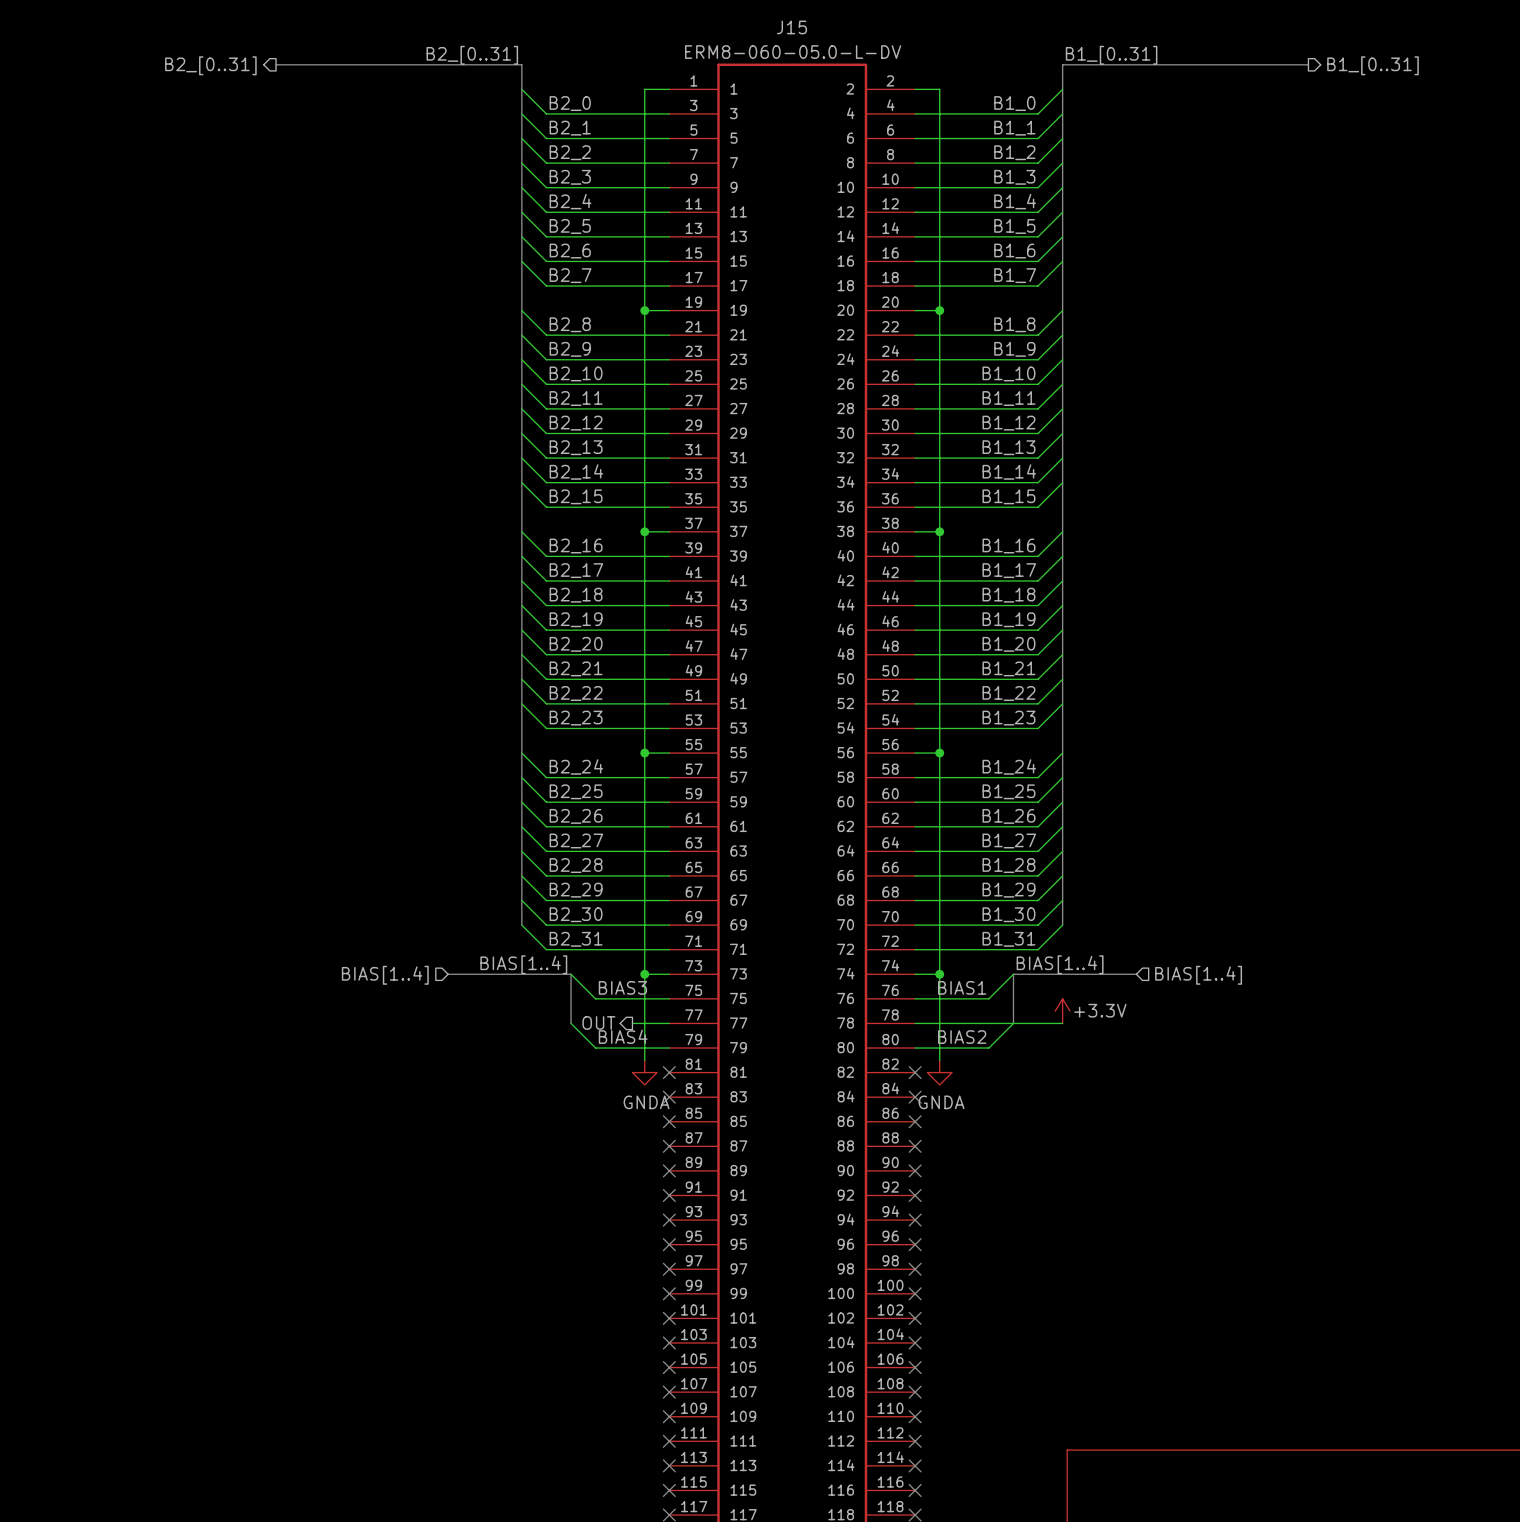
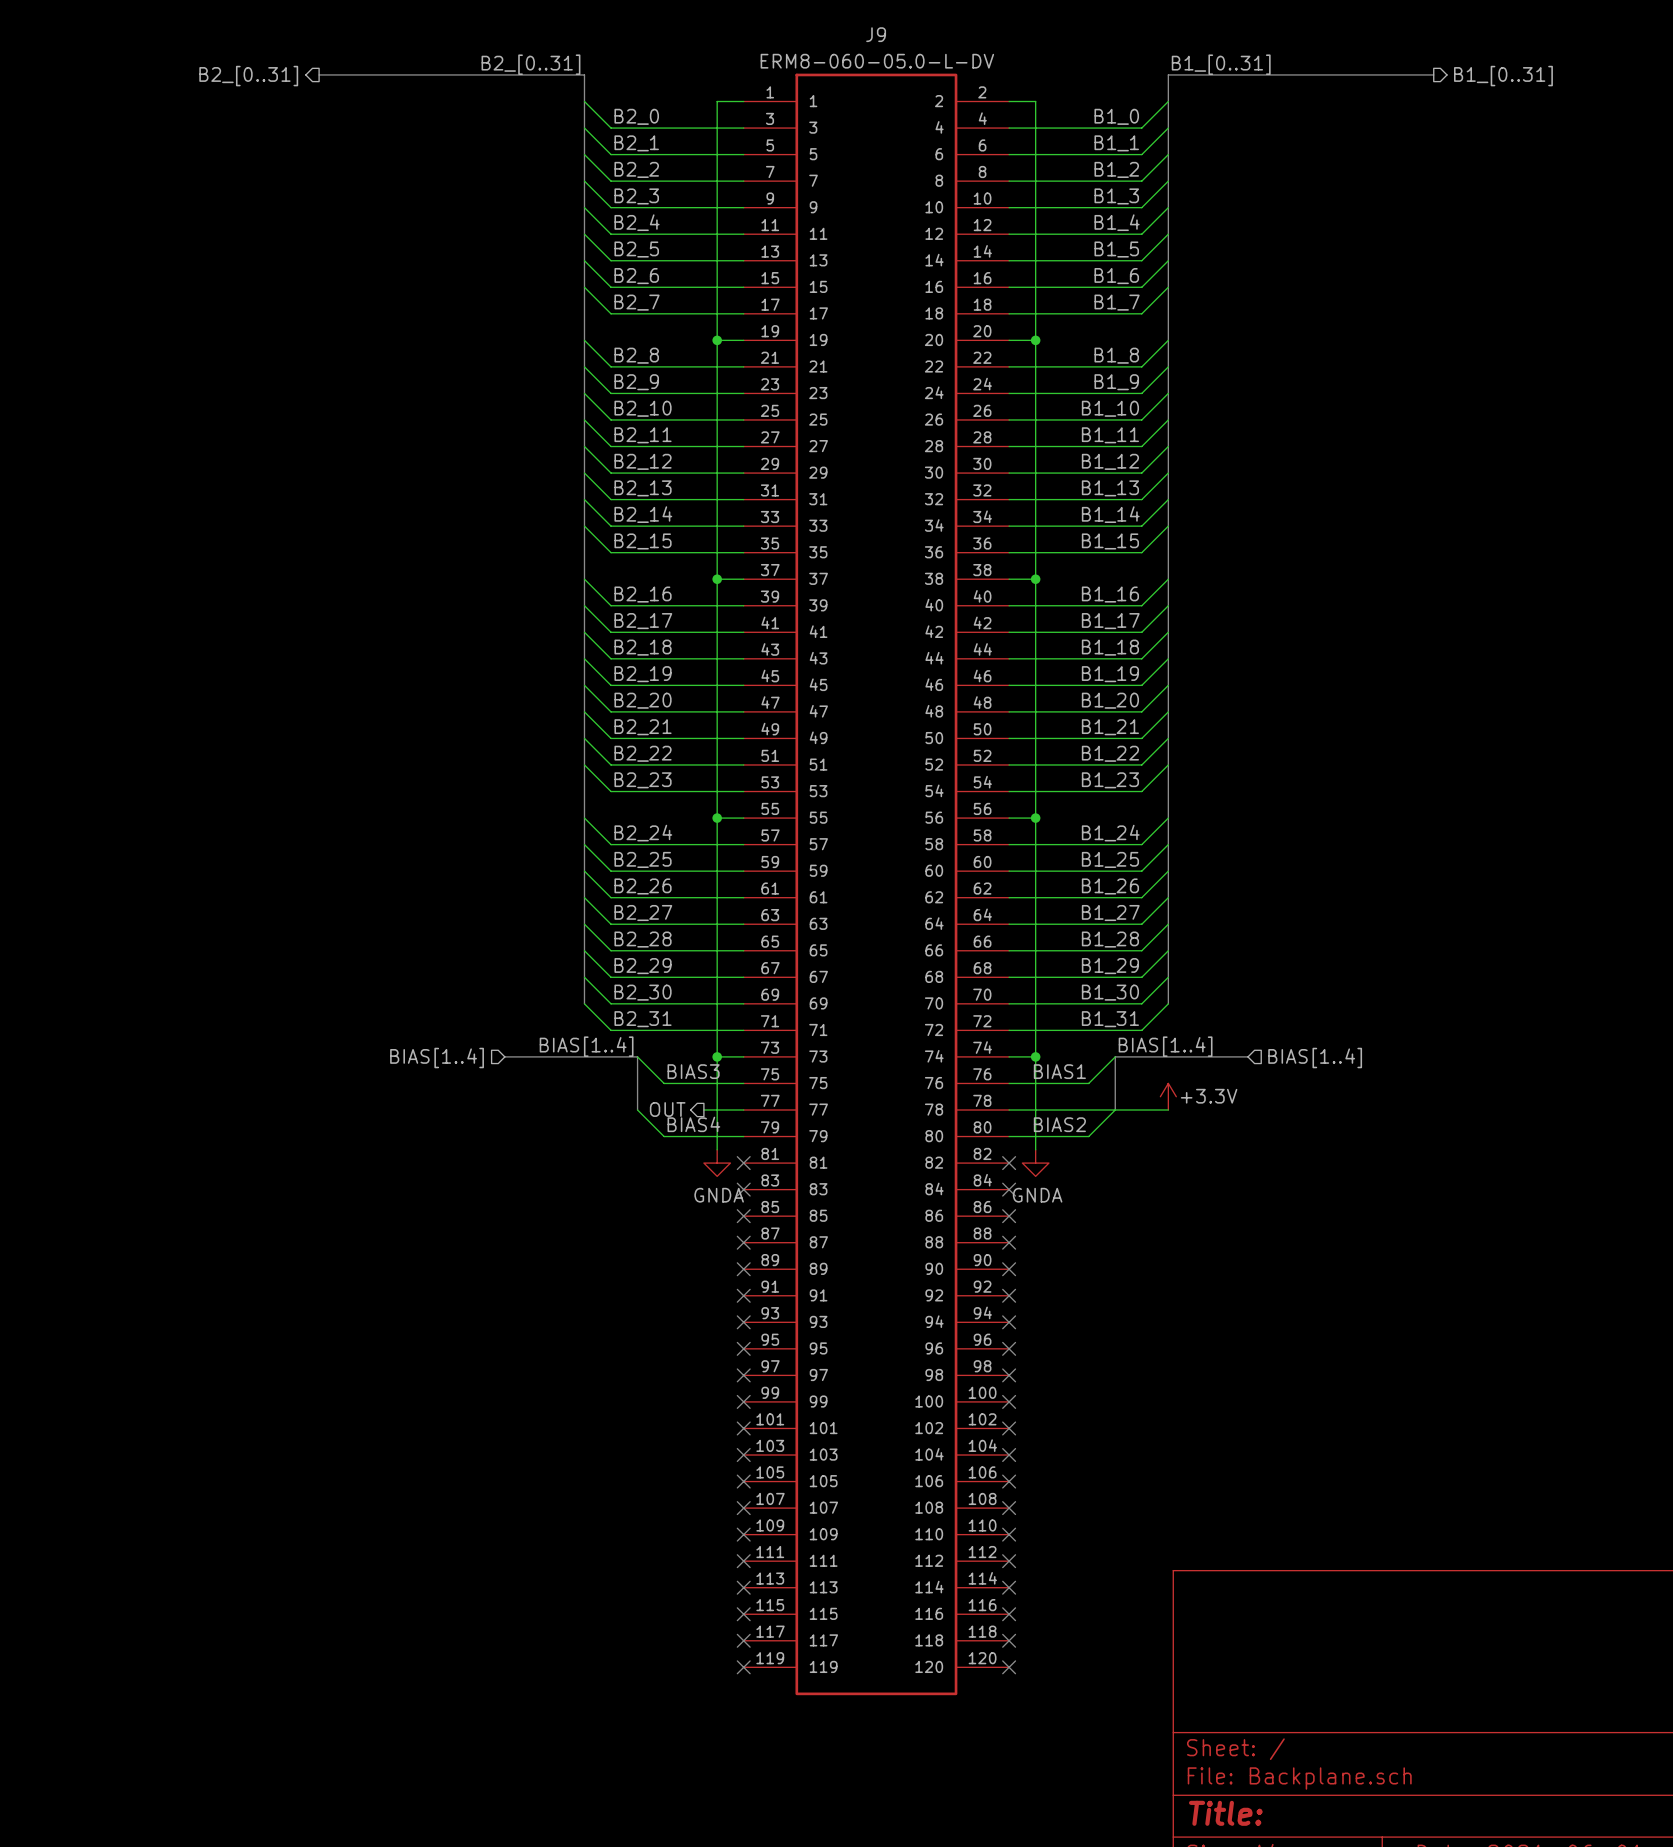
J15 name: J15 (791, 27) -> J9 (876, 34)

